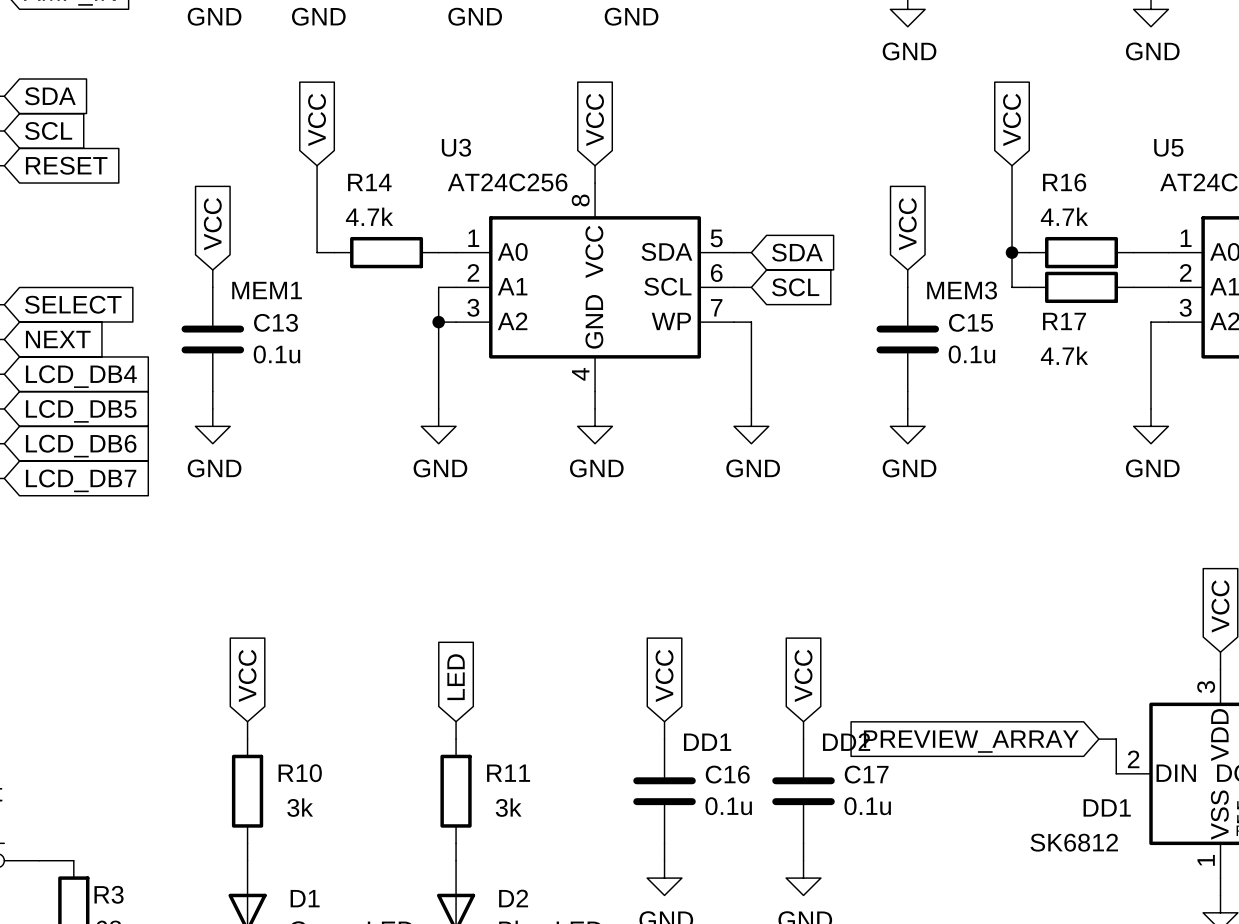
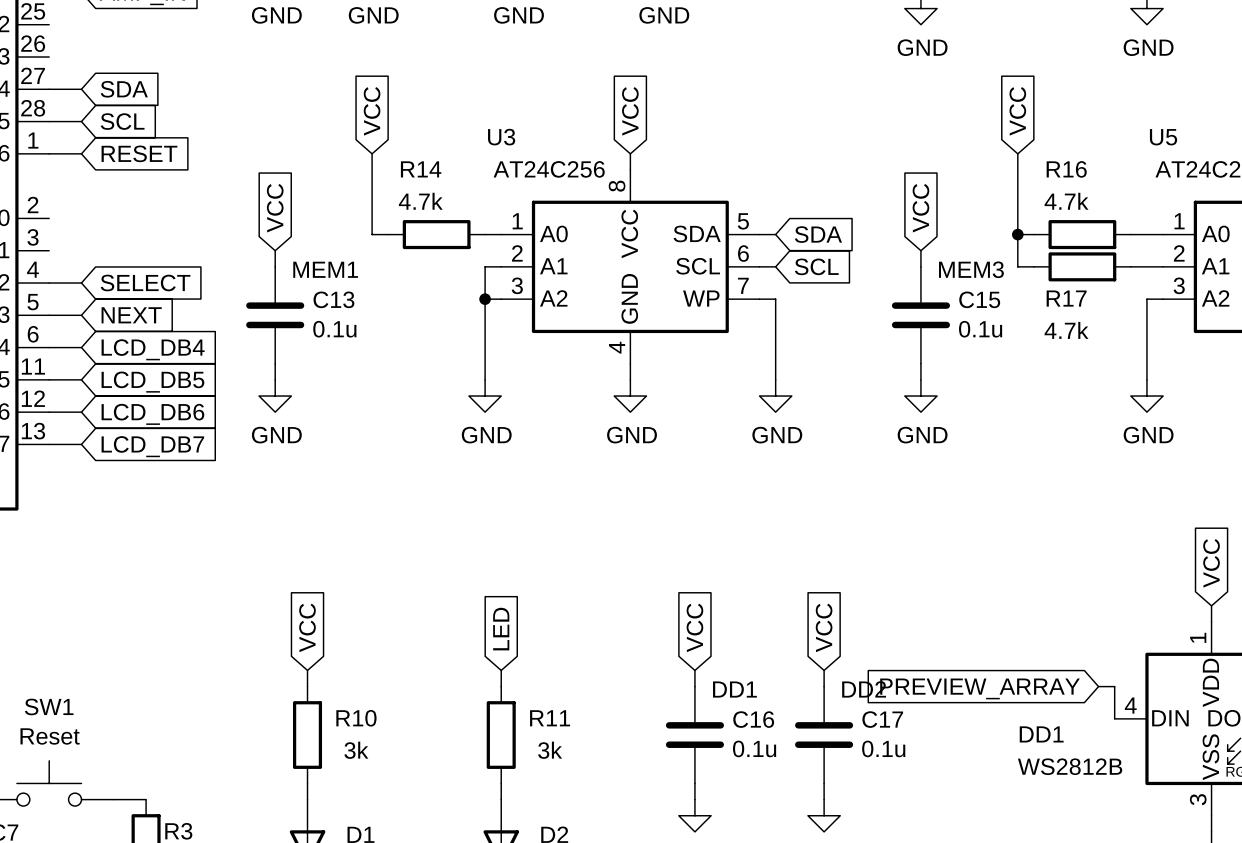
DD1 pin number: 3 (1206, 687) -> 1 (1198, 637)
DD1 pin number: 2 (1133, 759) -> 4 (1130, 705)
DD1 name position: DD1 (1107, 807) -> DD1 (1041, 734)
DD1 value: SK6812 (1074, 842) -> WS2812B (1070, 766)
DD1 pin number: 1 (1206, 860) -> 3 (1198, 799)

